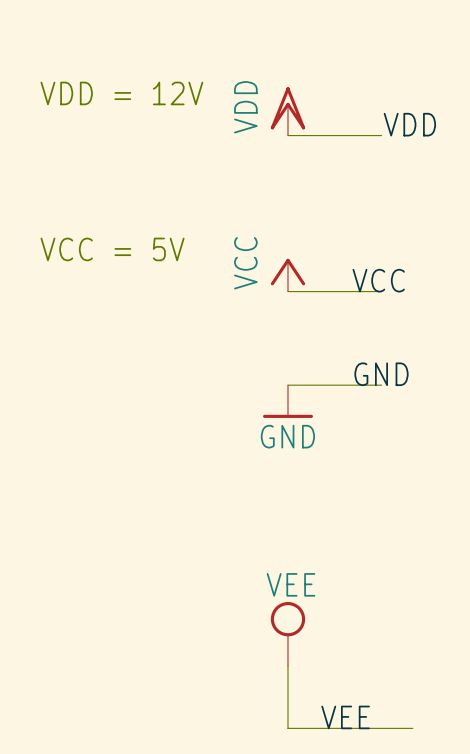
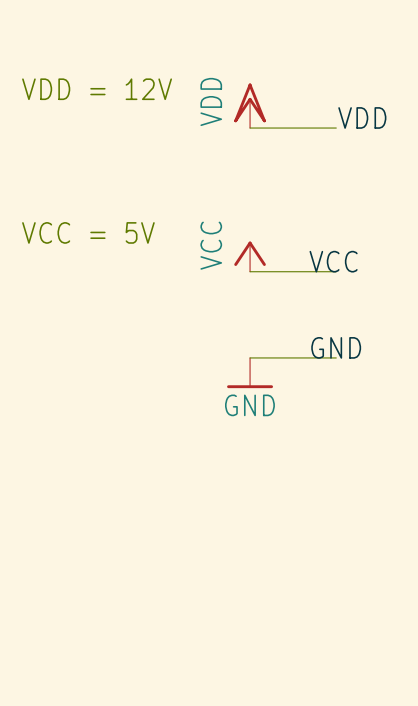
power symbol: VEE (287, 633) -> none
wire: (287, 665) (287, 728) (412, 728) -> none
label: VEE (345, 717) -> none

